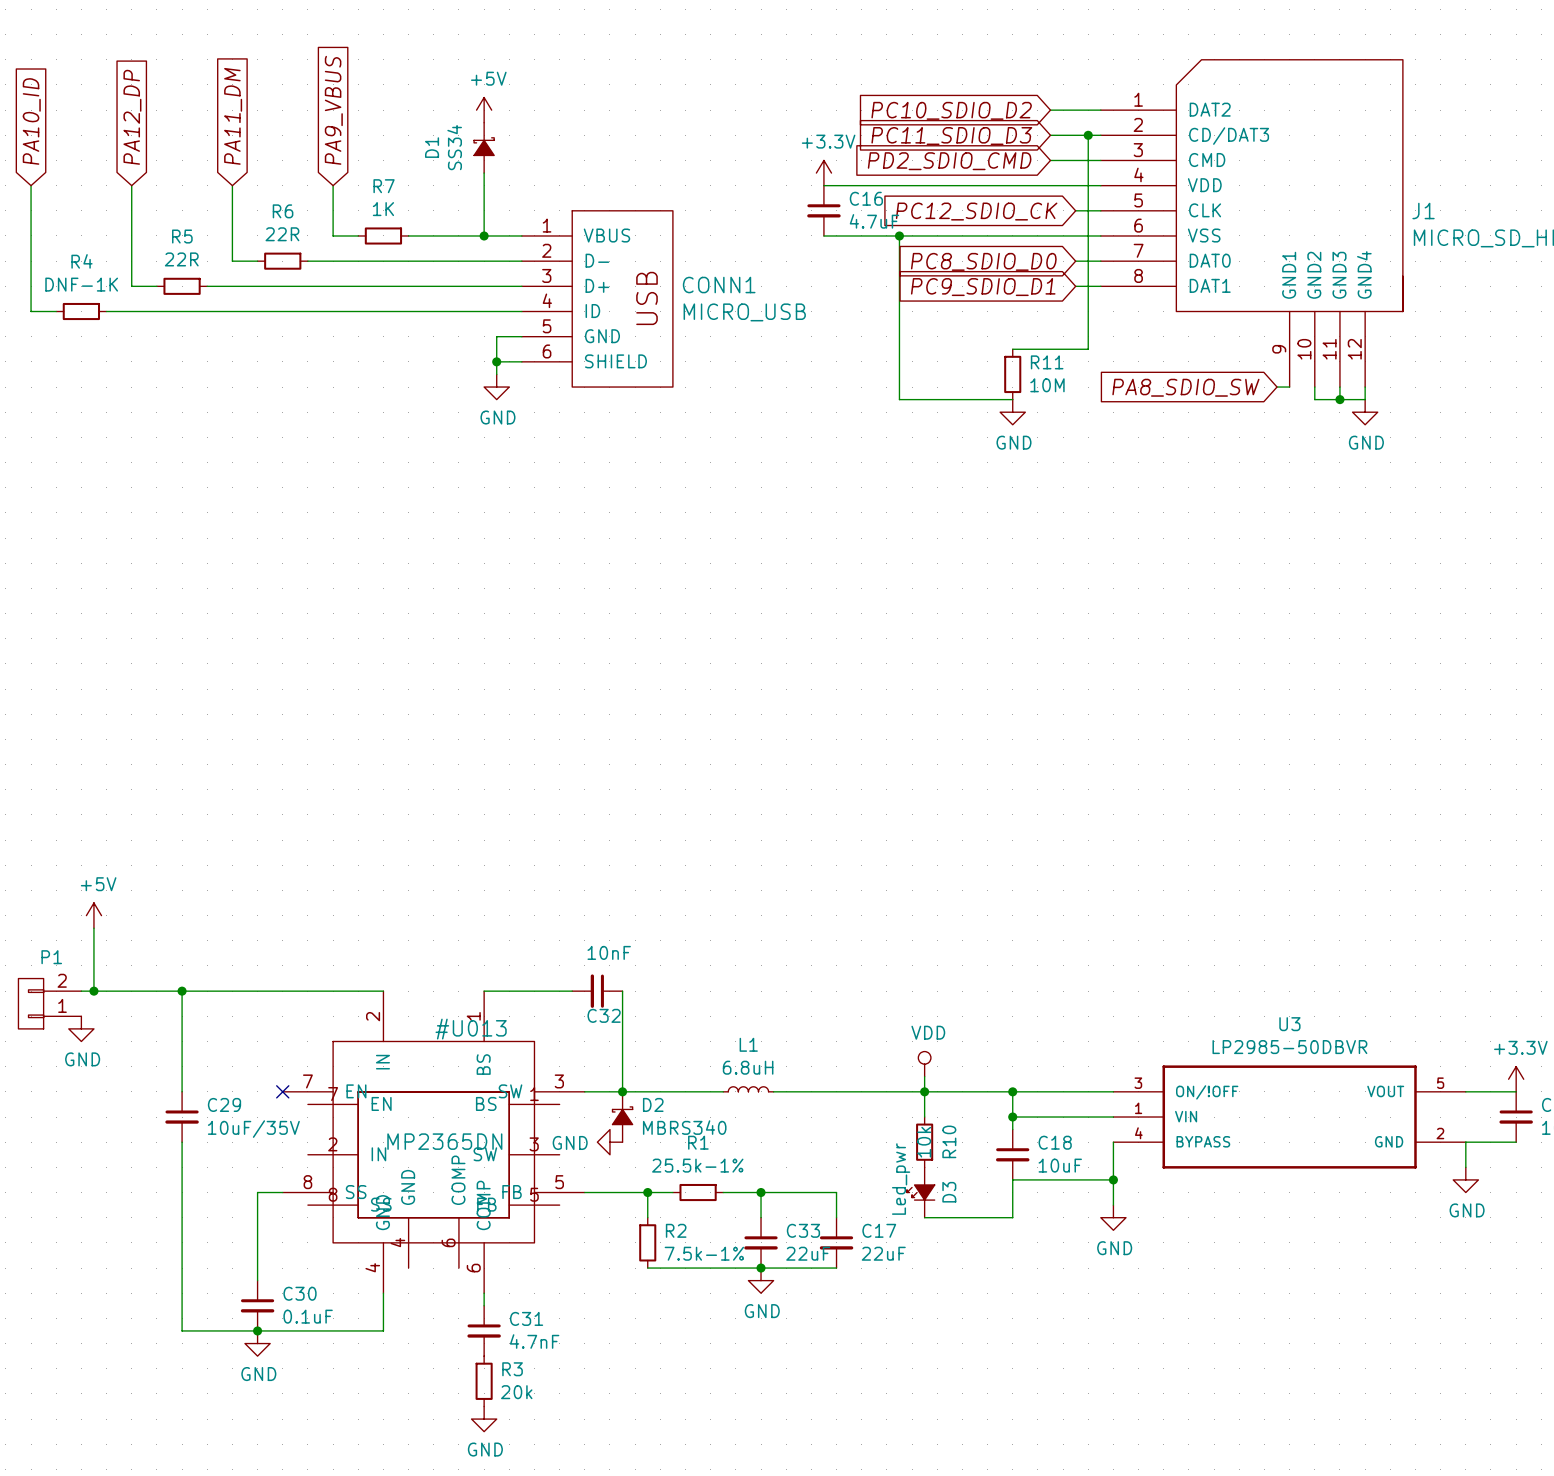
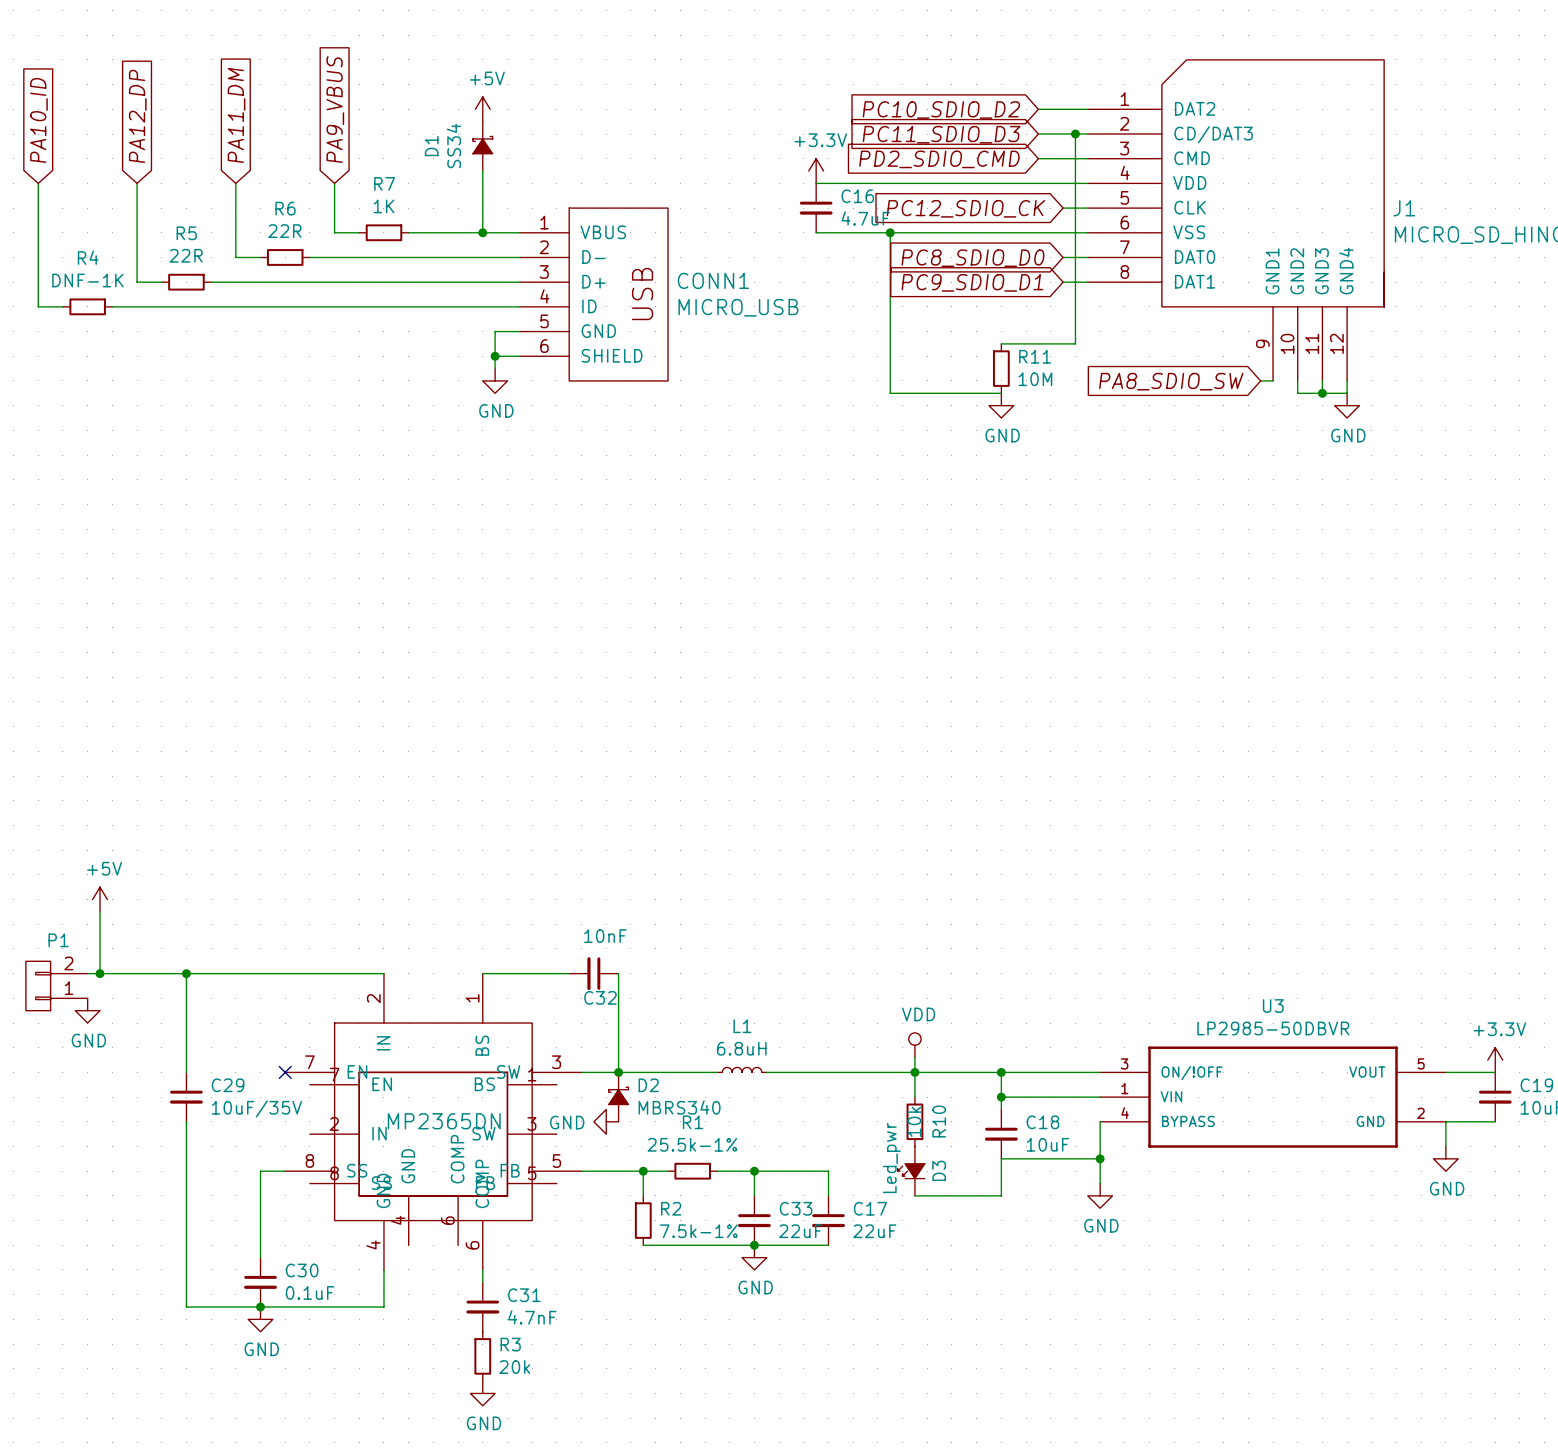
#U013 name: #U013 (471, 1029) -> none

